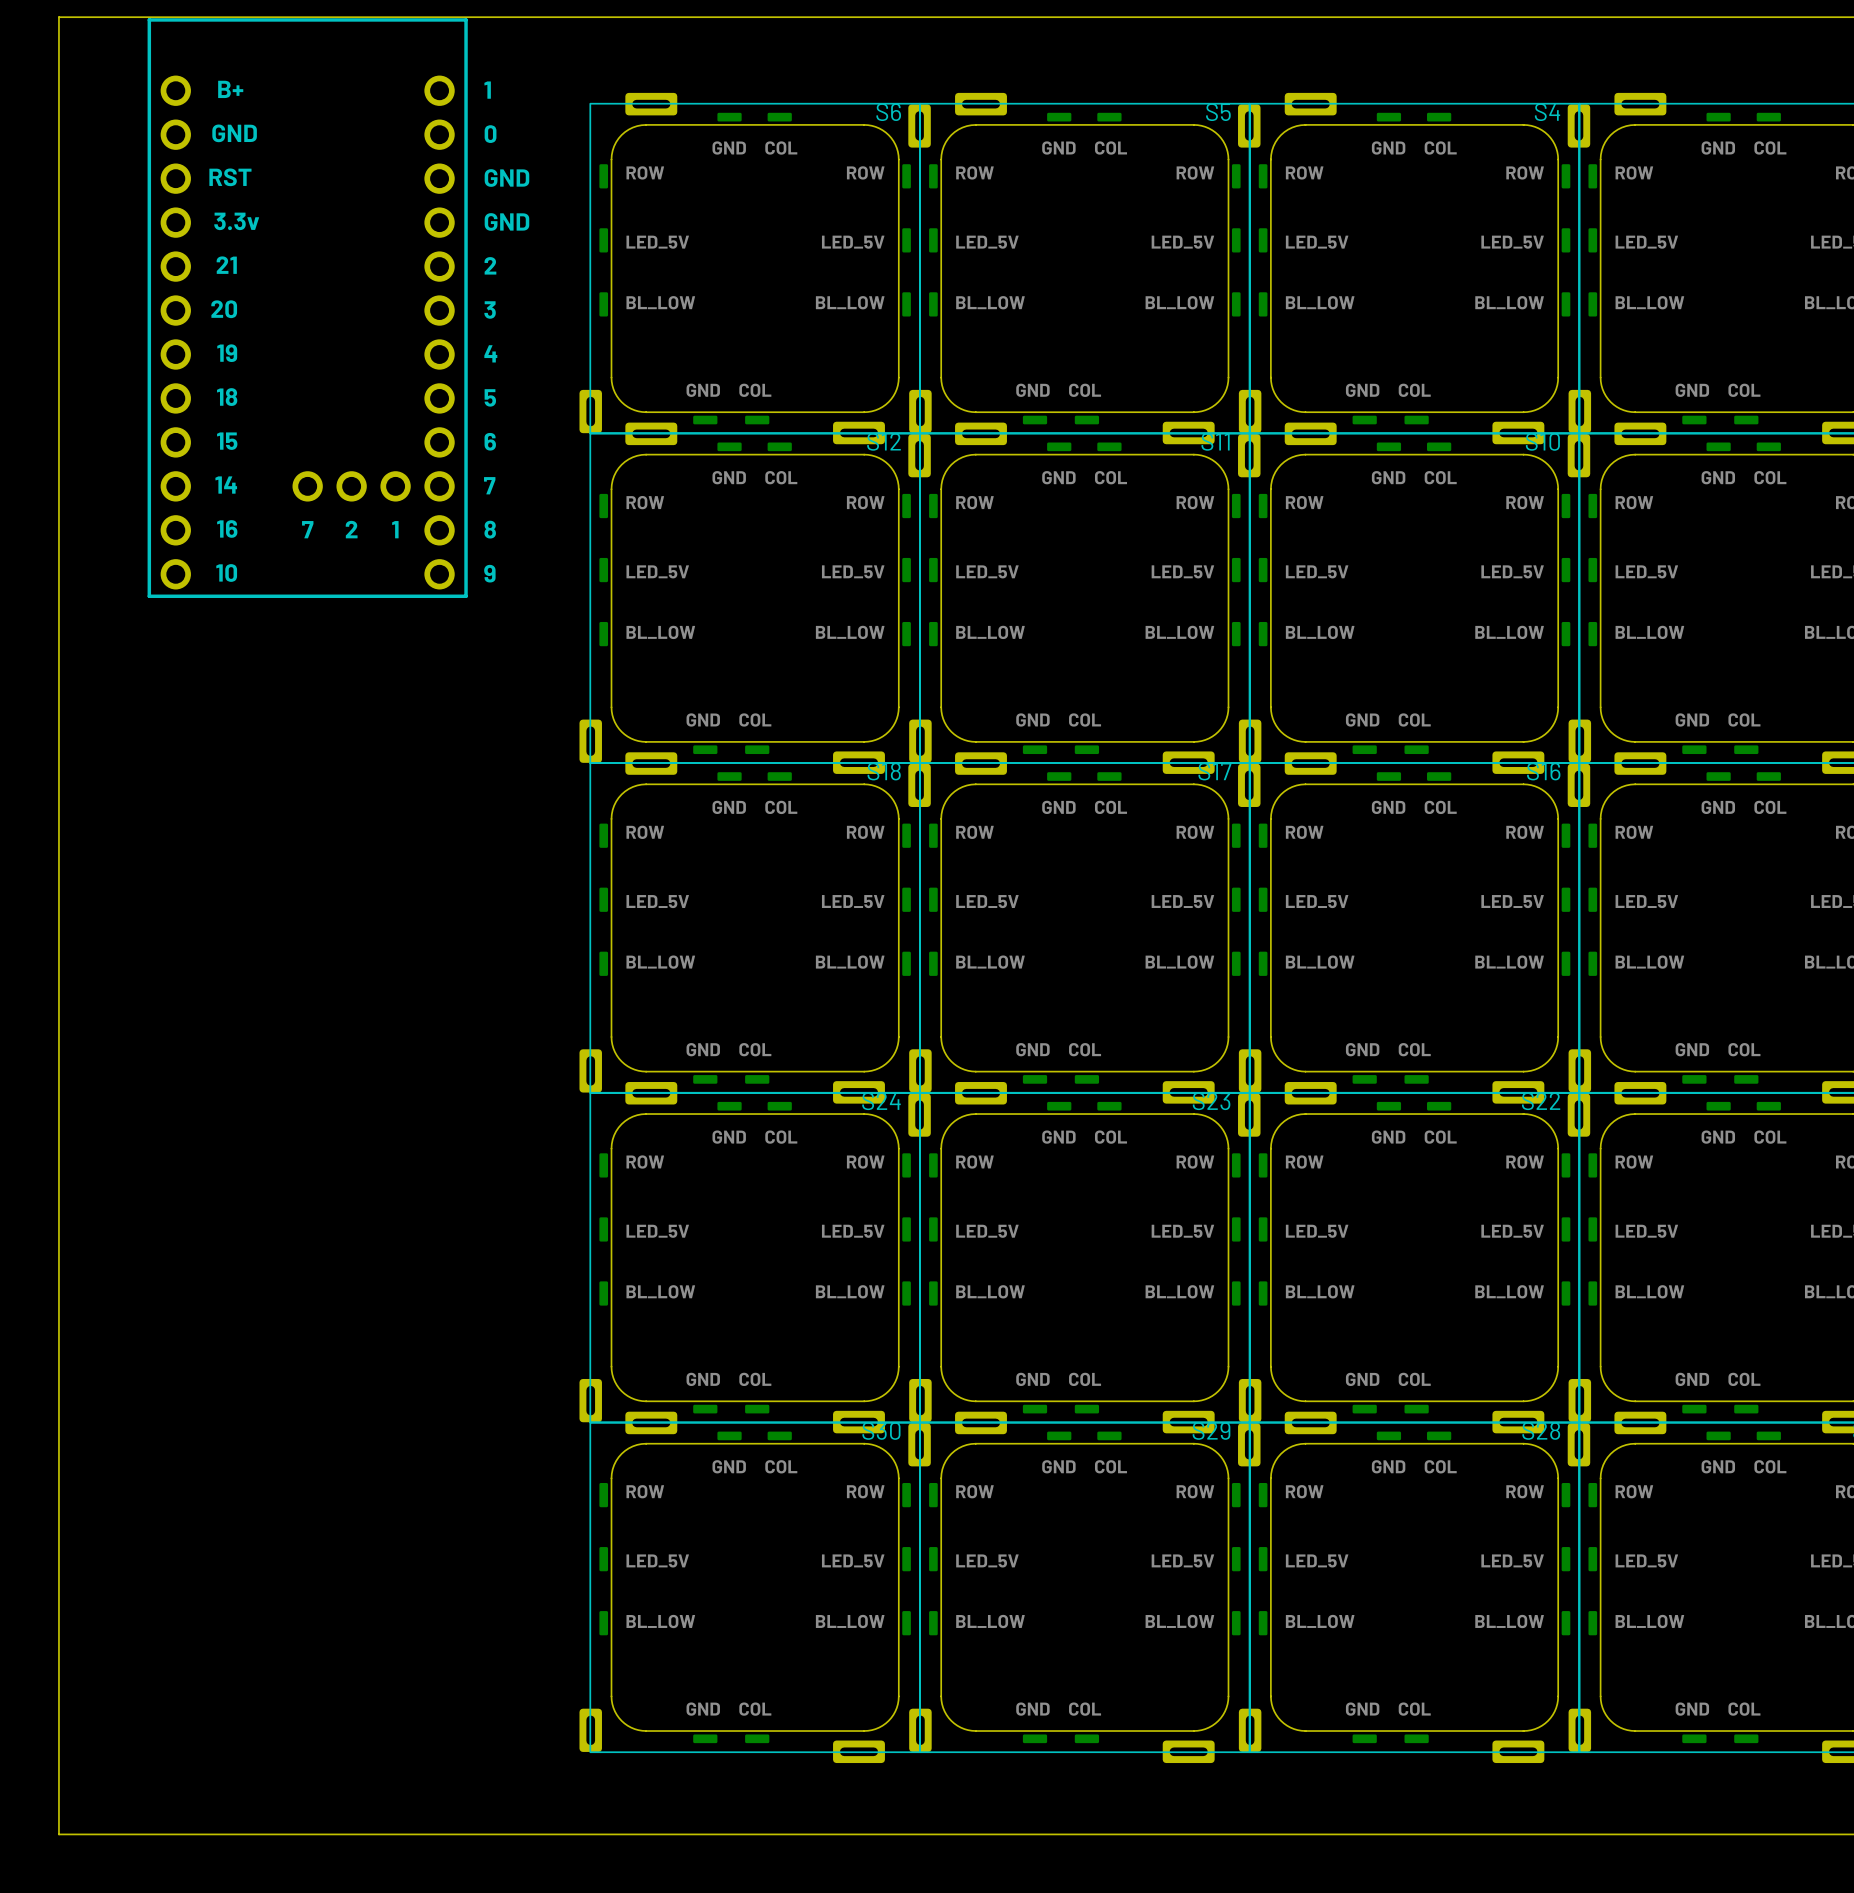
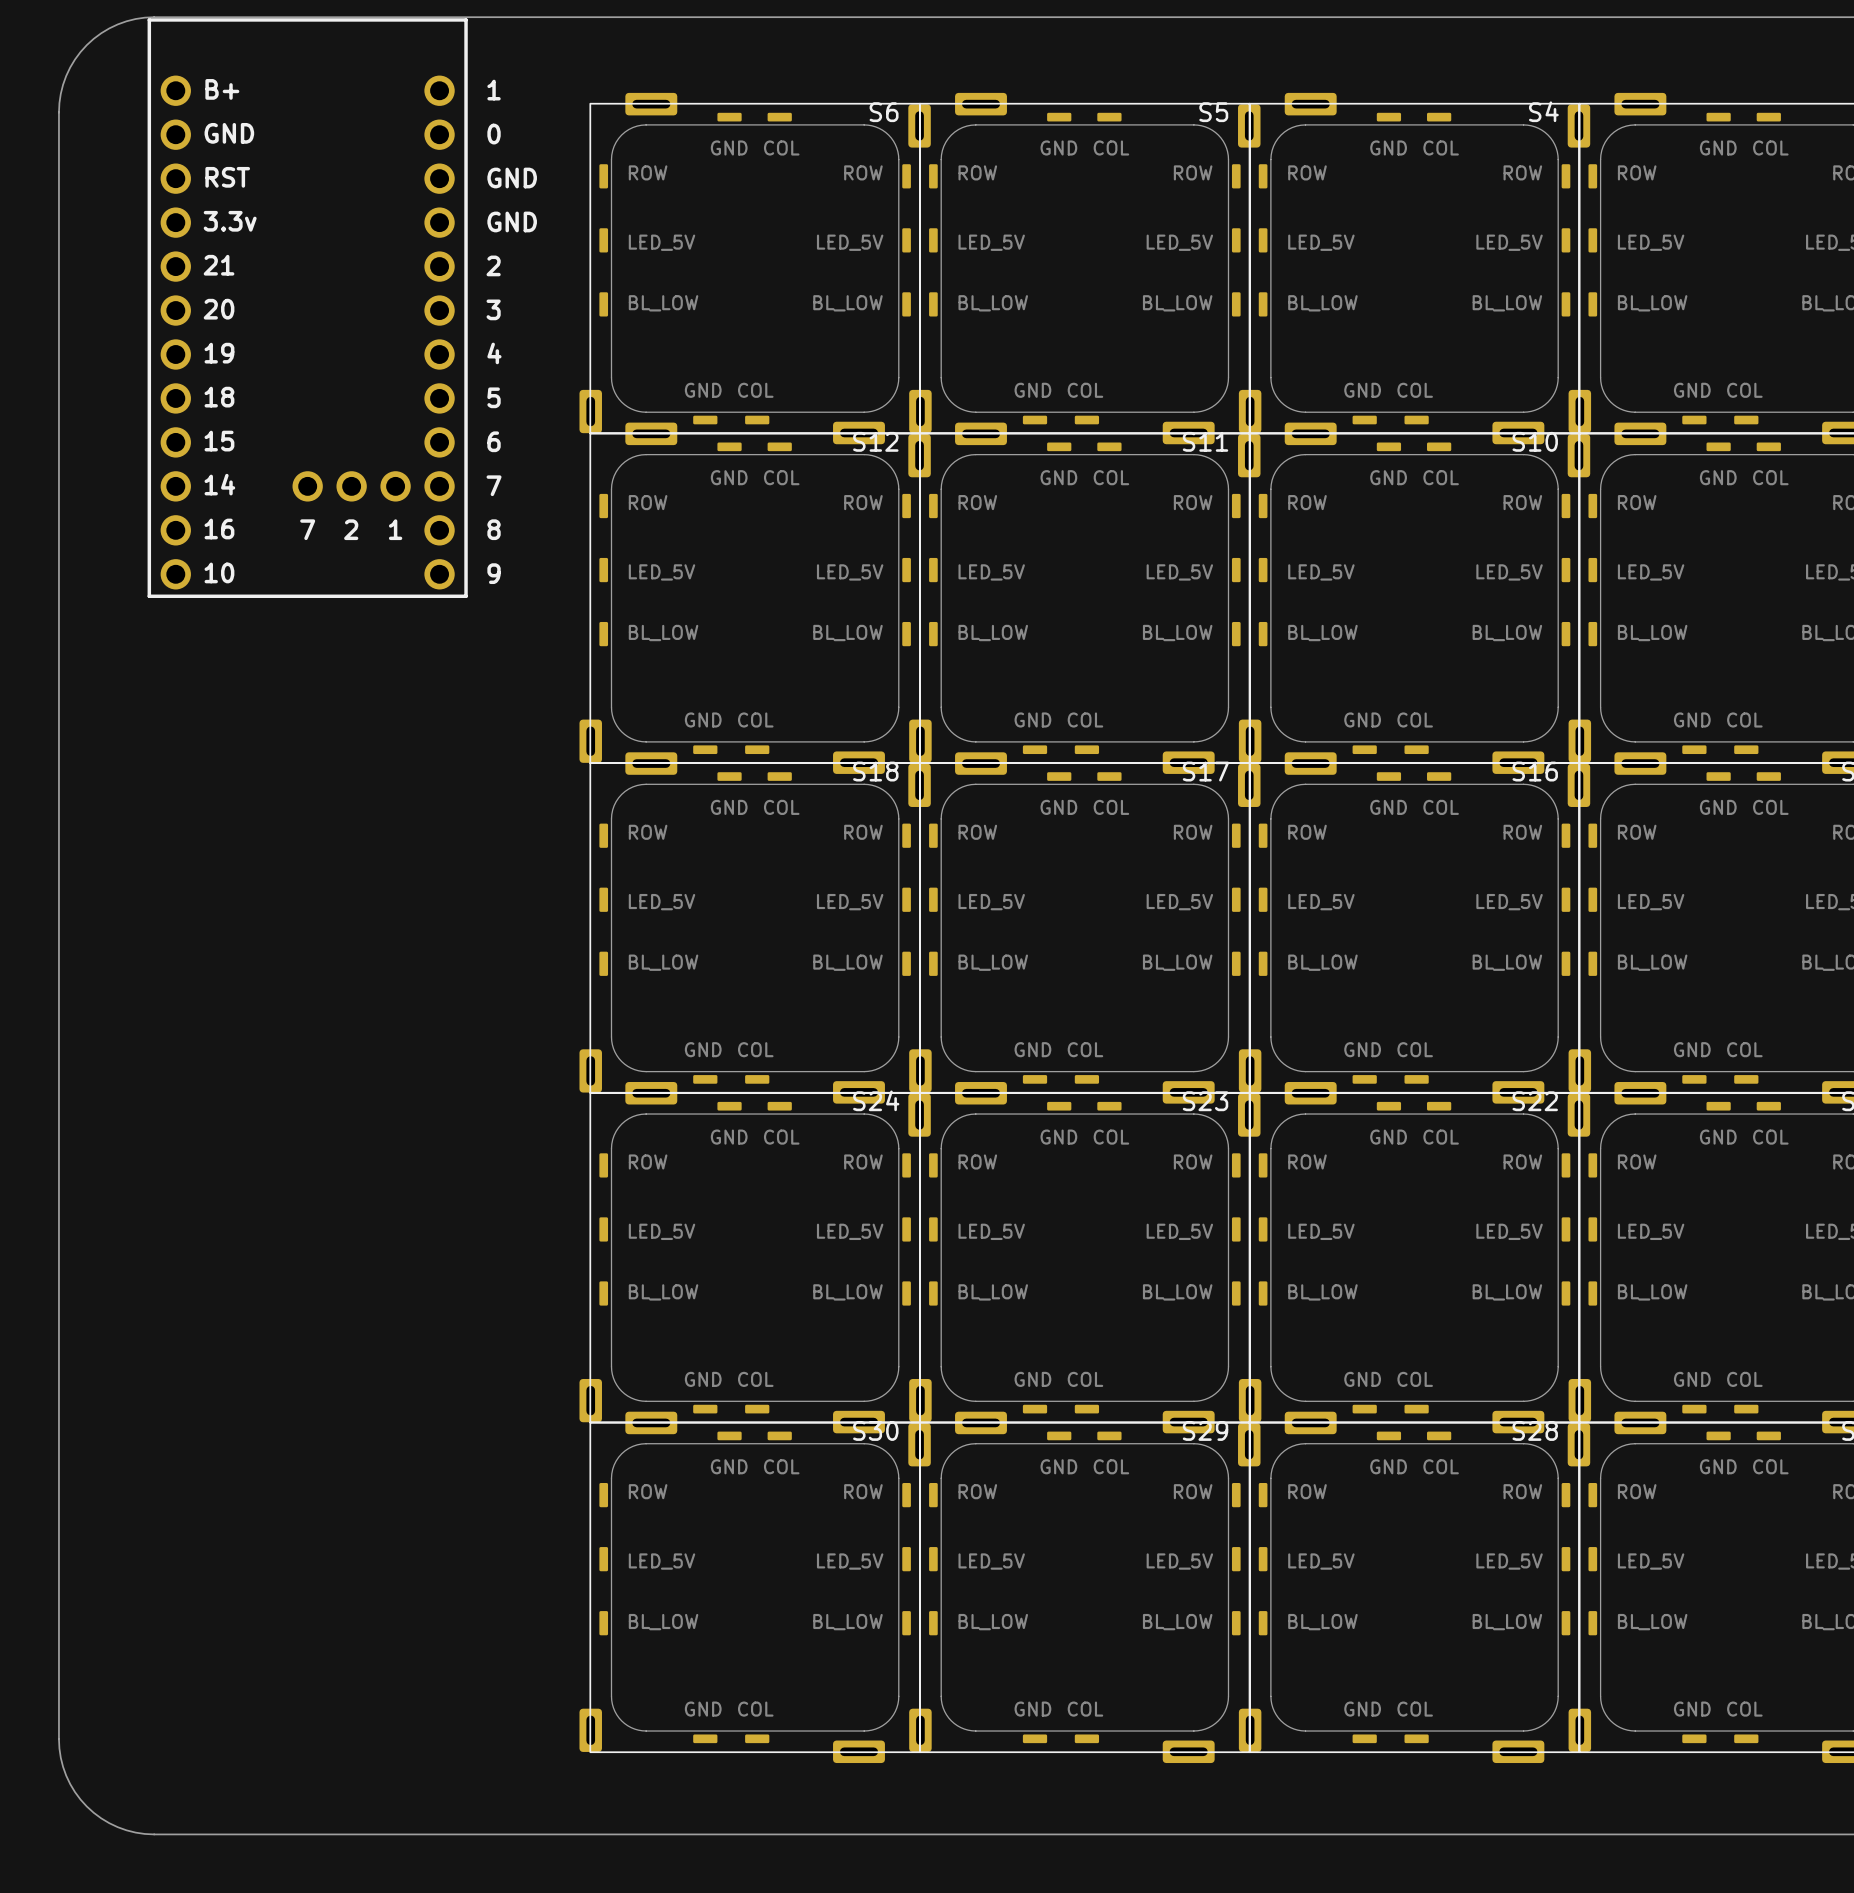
board edge: (154, 17) (58, 17) (58, 112) -> (154, 17) (135, 19) (117, 24) (101, 33) (86, 45) (75, 59) (66, 75) (60, 93) (58, 112)
board edge: (58, 1739) (58, 1834) (154, 1834) -> (58, 1739) (60, 1757) (66, 1775) (75, 1792) (86, 1806) (101, 1818) (117, 1827) (135, 1832) (154, 1834)

